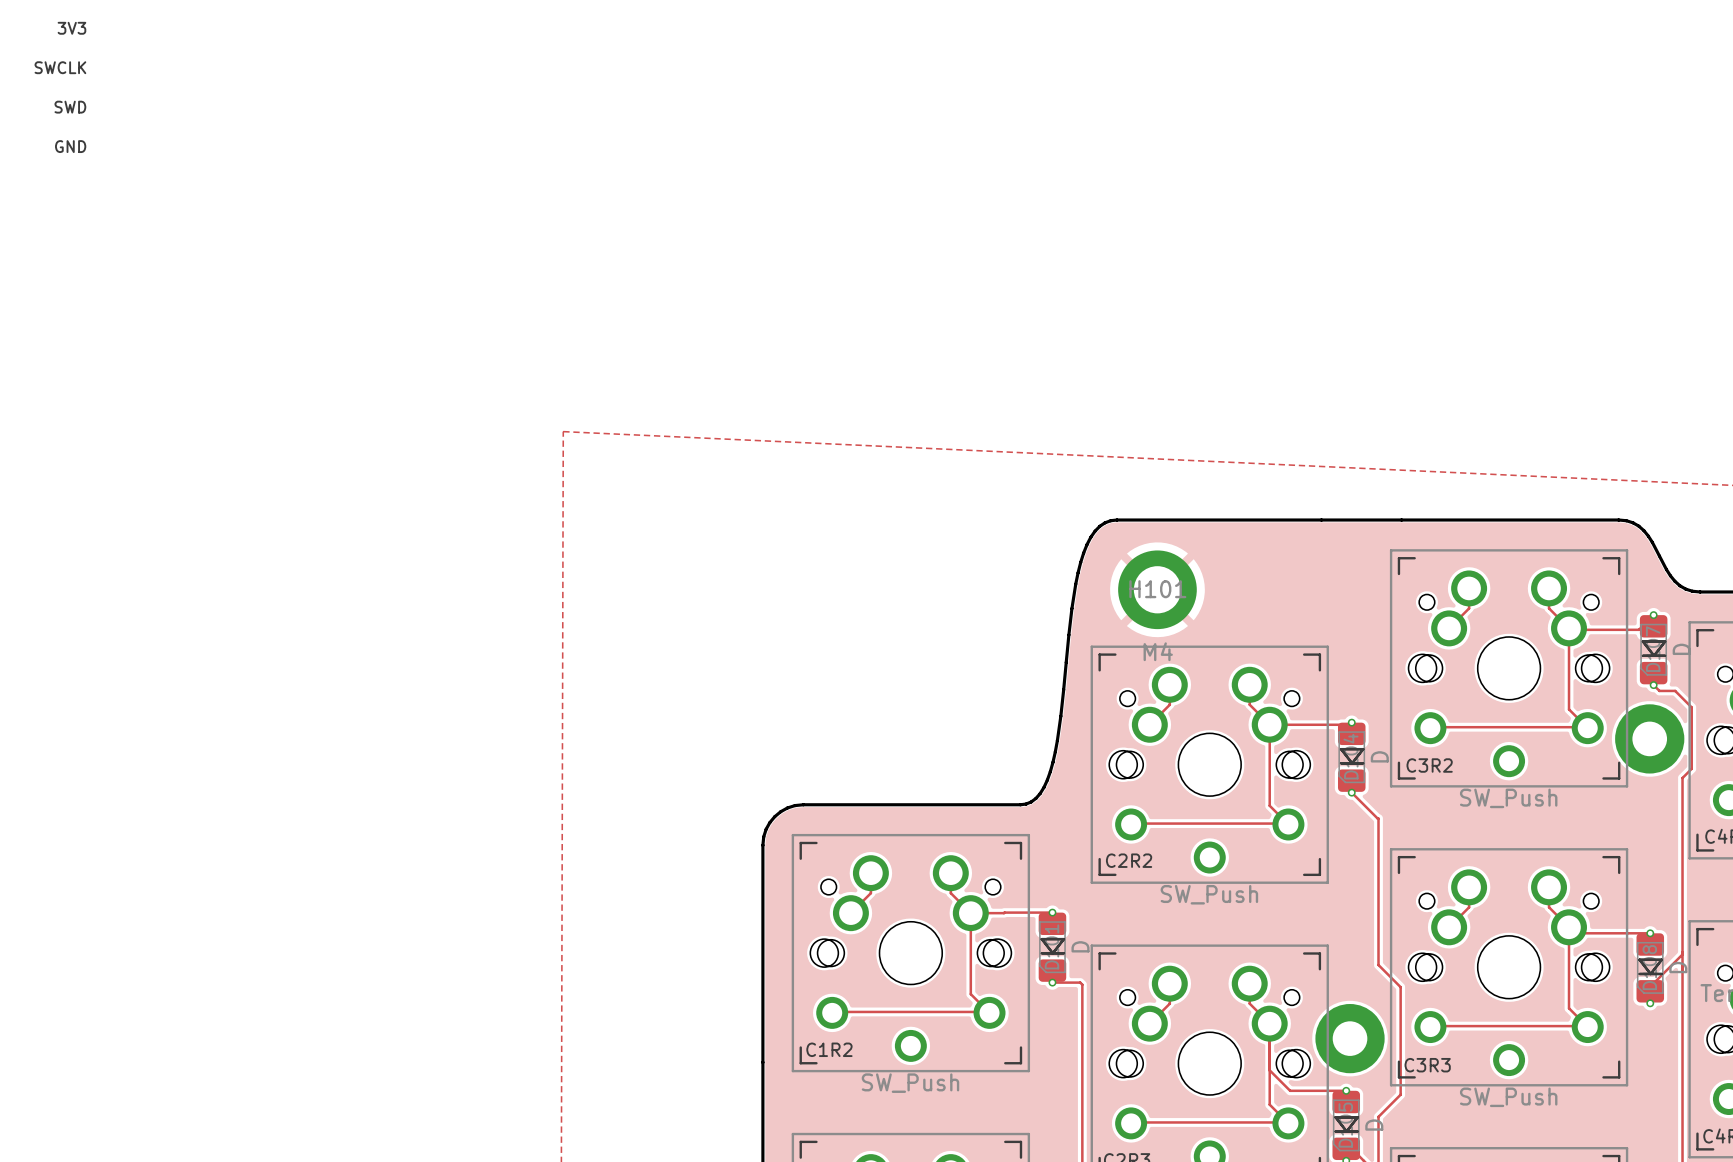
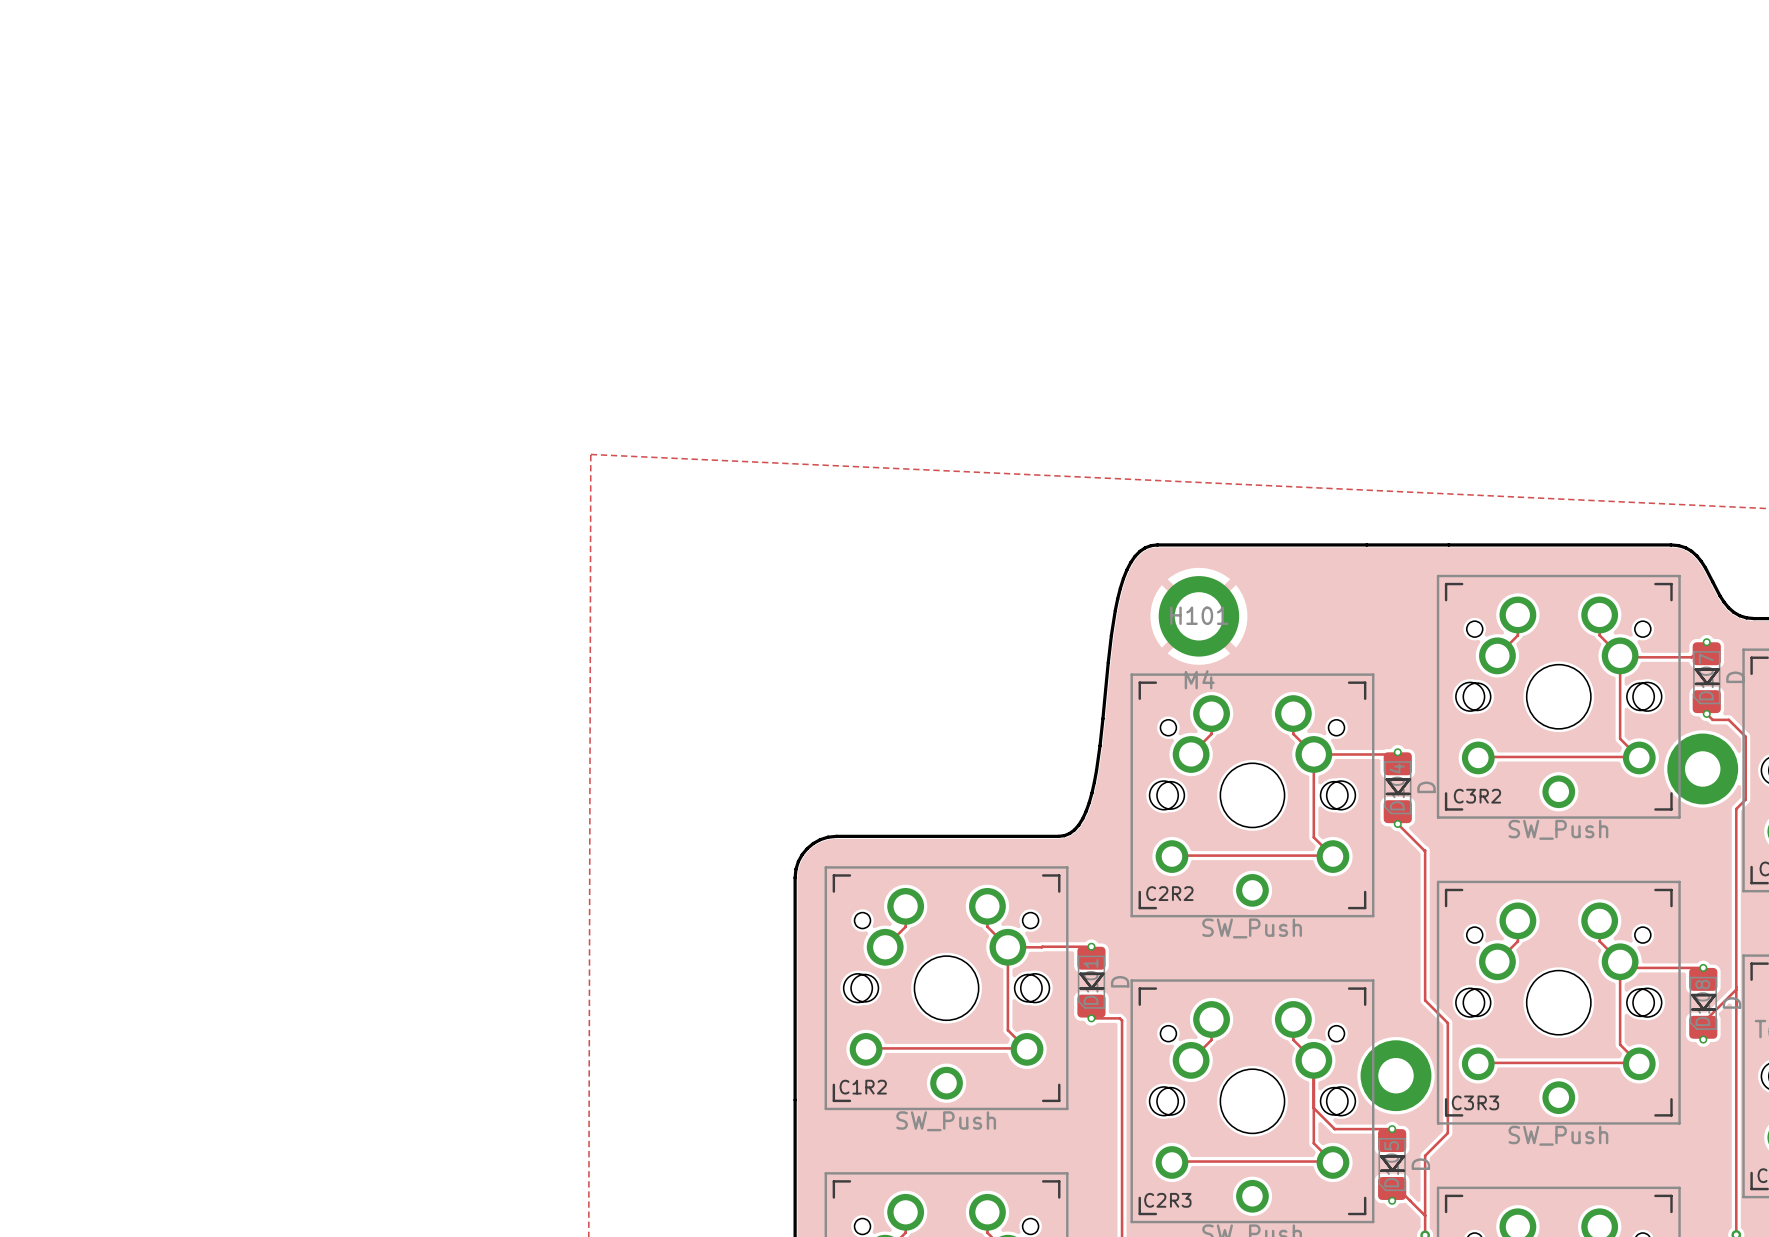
text: 3V3 (71, 28) -> none
text: SWCLK (60, 67) -> none
text: SWD (70, 107) -> none
text: GND (70, 146) -> none

